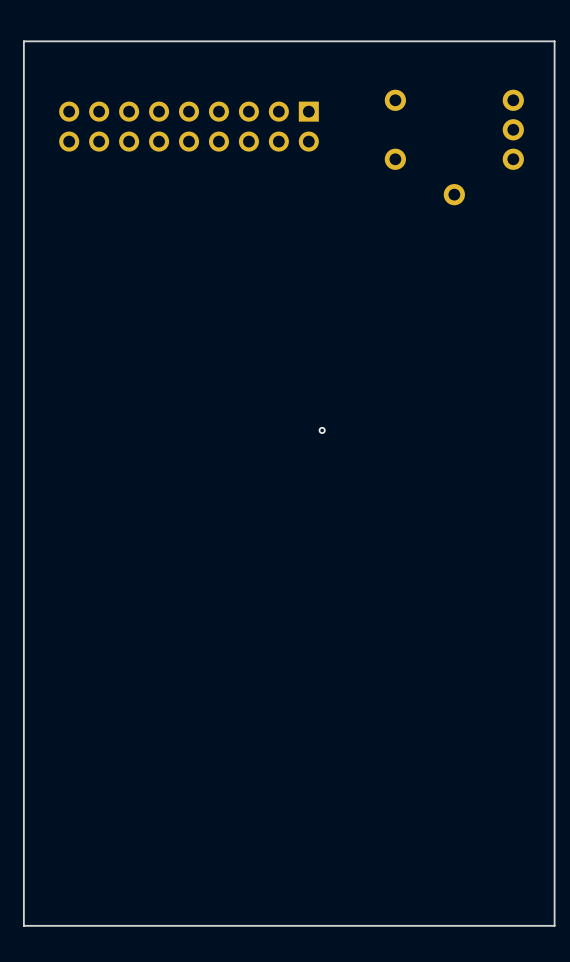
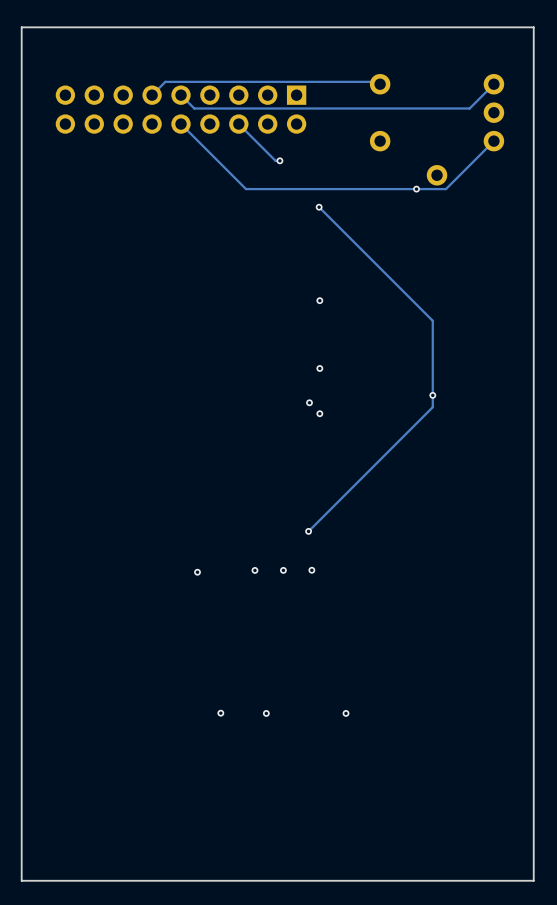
track: none -> (380, 84) (377, 81) (165, 81) (152, 95)
track: none -> (493, 84) (469, 108) (194, 108) (181, 95)
track: none -> (181, 124) (246, 189) (445, 189) (493, 141)
track: none -> (238, 124) (275, 160) (279, 160)
via: none -> (279, 160)
via: none -> (416, 189)
track: none -> (319, 207) (432, 320) (432, 407) (308, 531)
via: none -> (319, 207)
via: none -> (319, 300)
via: none -> (319, 368)
via: none -> (432, 395)
via: none -> (319, 413)
via: none -> (308, 531)
via: none -> (254, 570)
via: none -> (283, 570)
via: none -> (311, 570)
via: none -> (197, 572)
via: none -> (220, 713)
via: none -> (266, 713)
via: none -> (346, 713)

